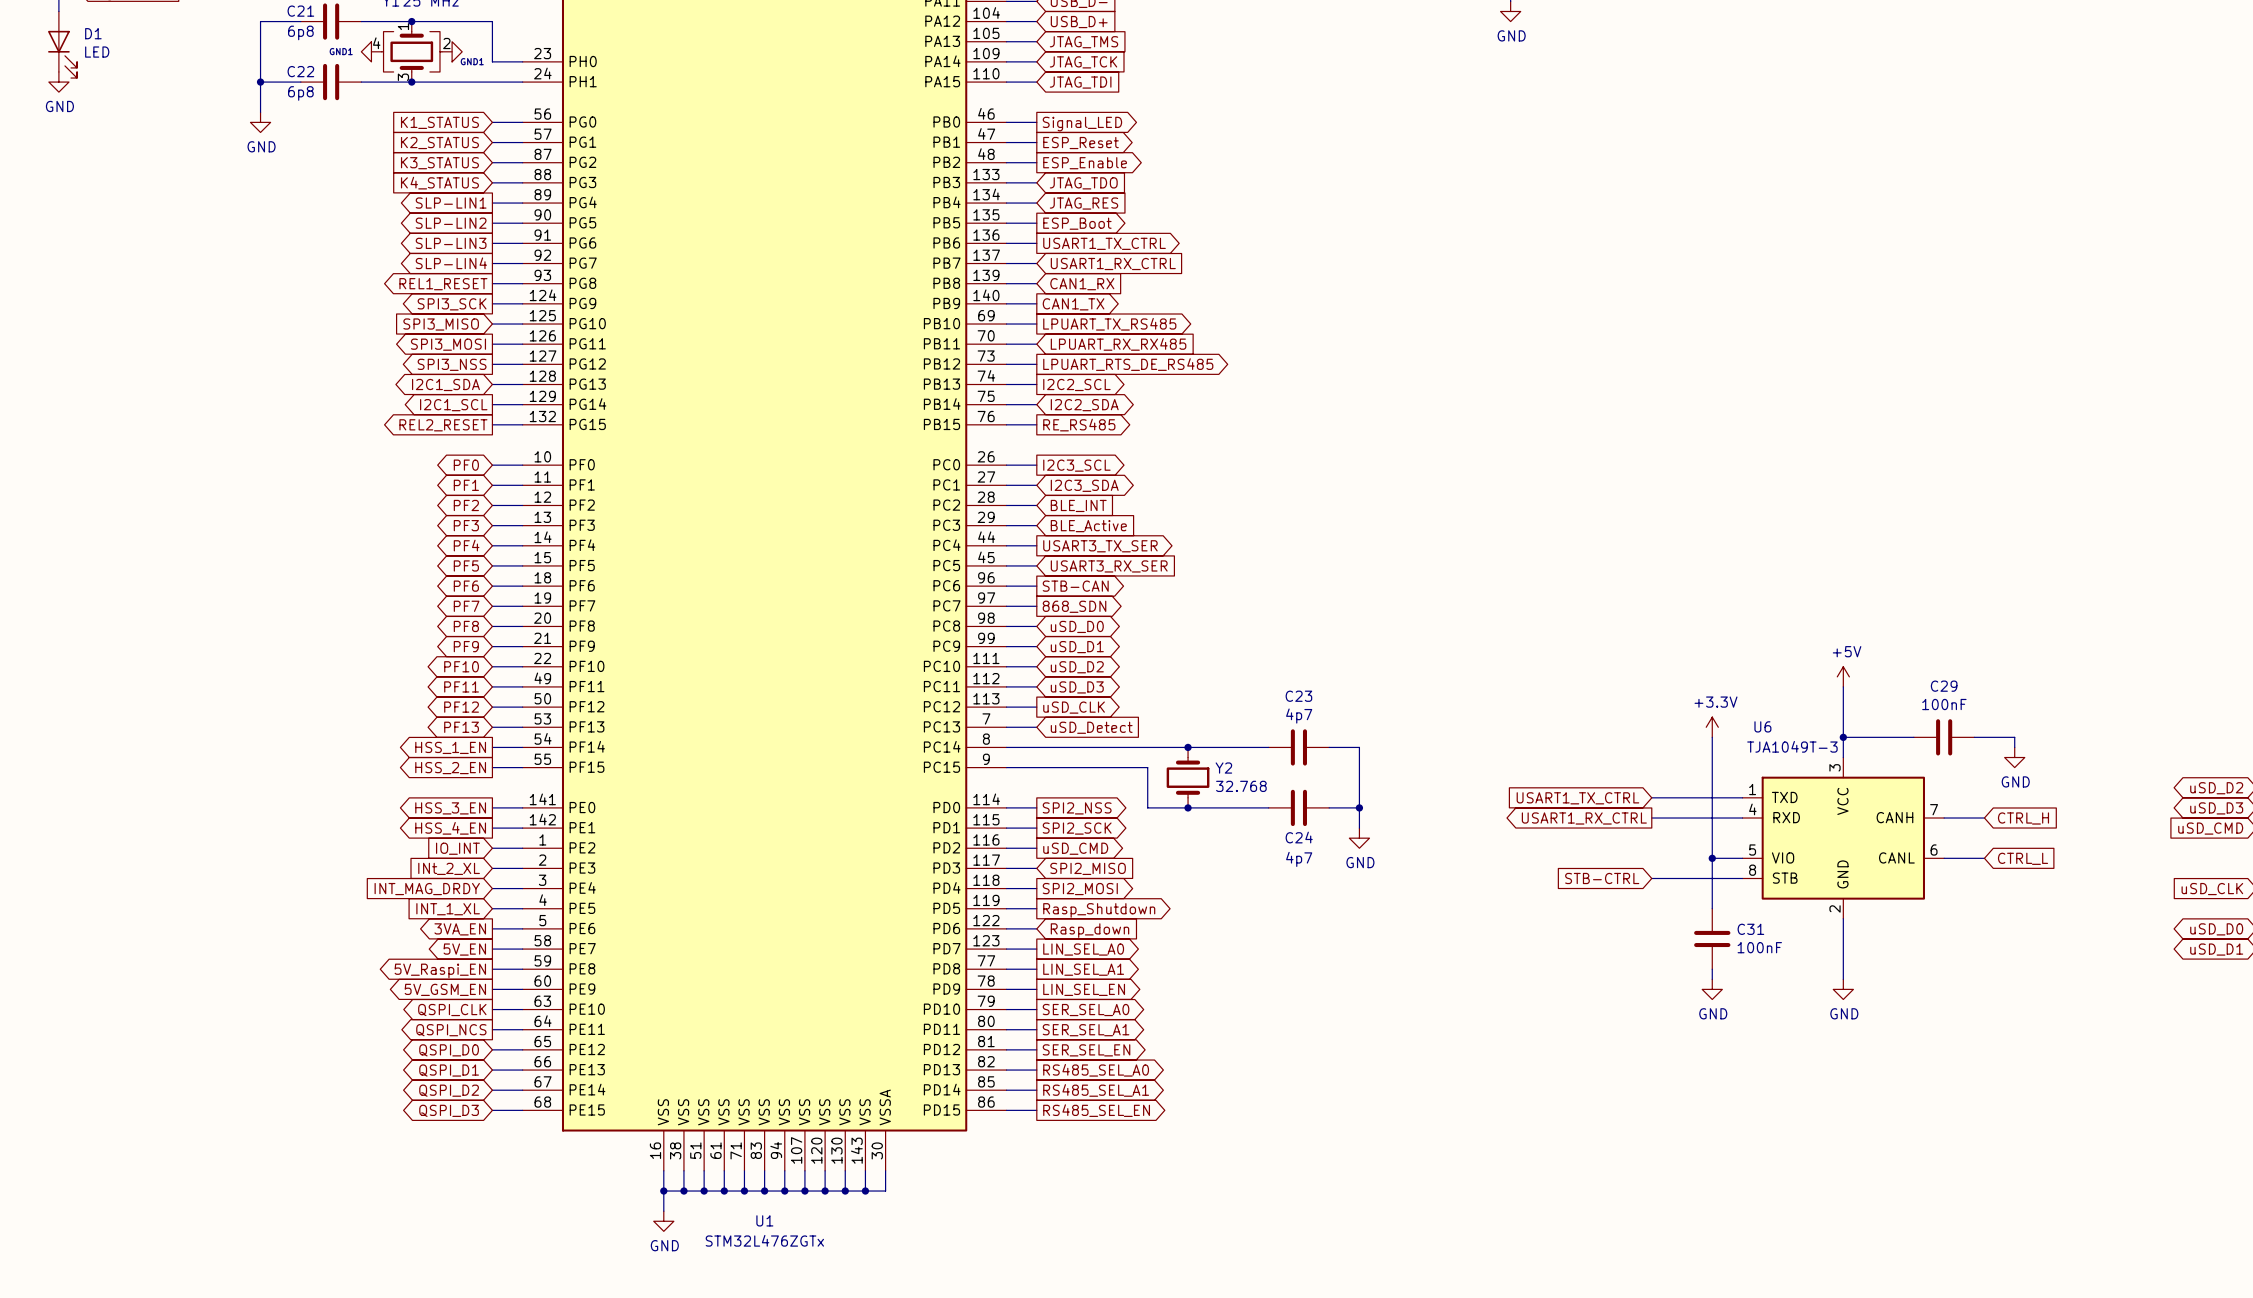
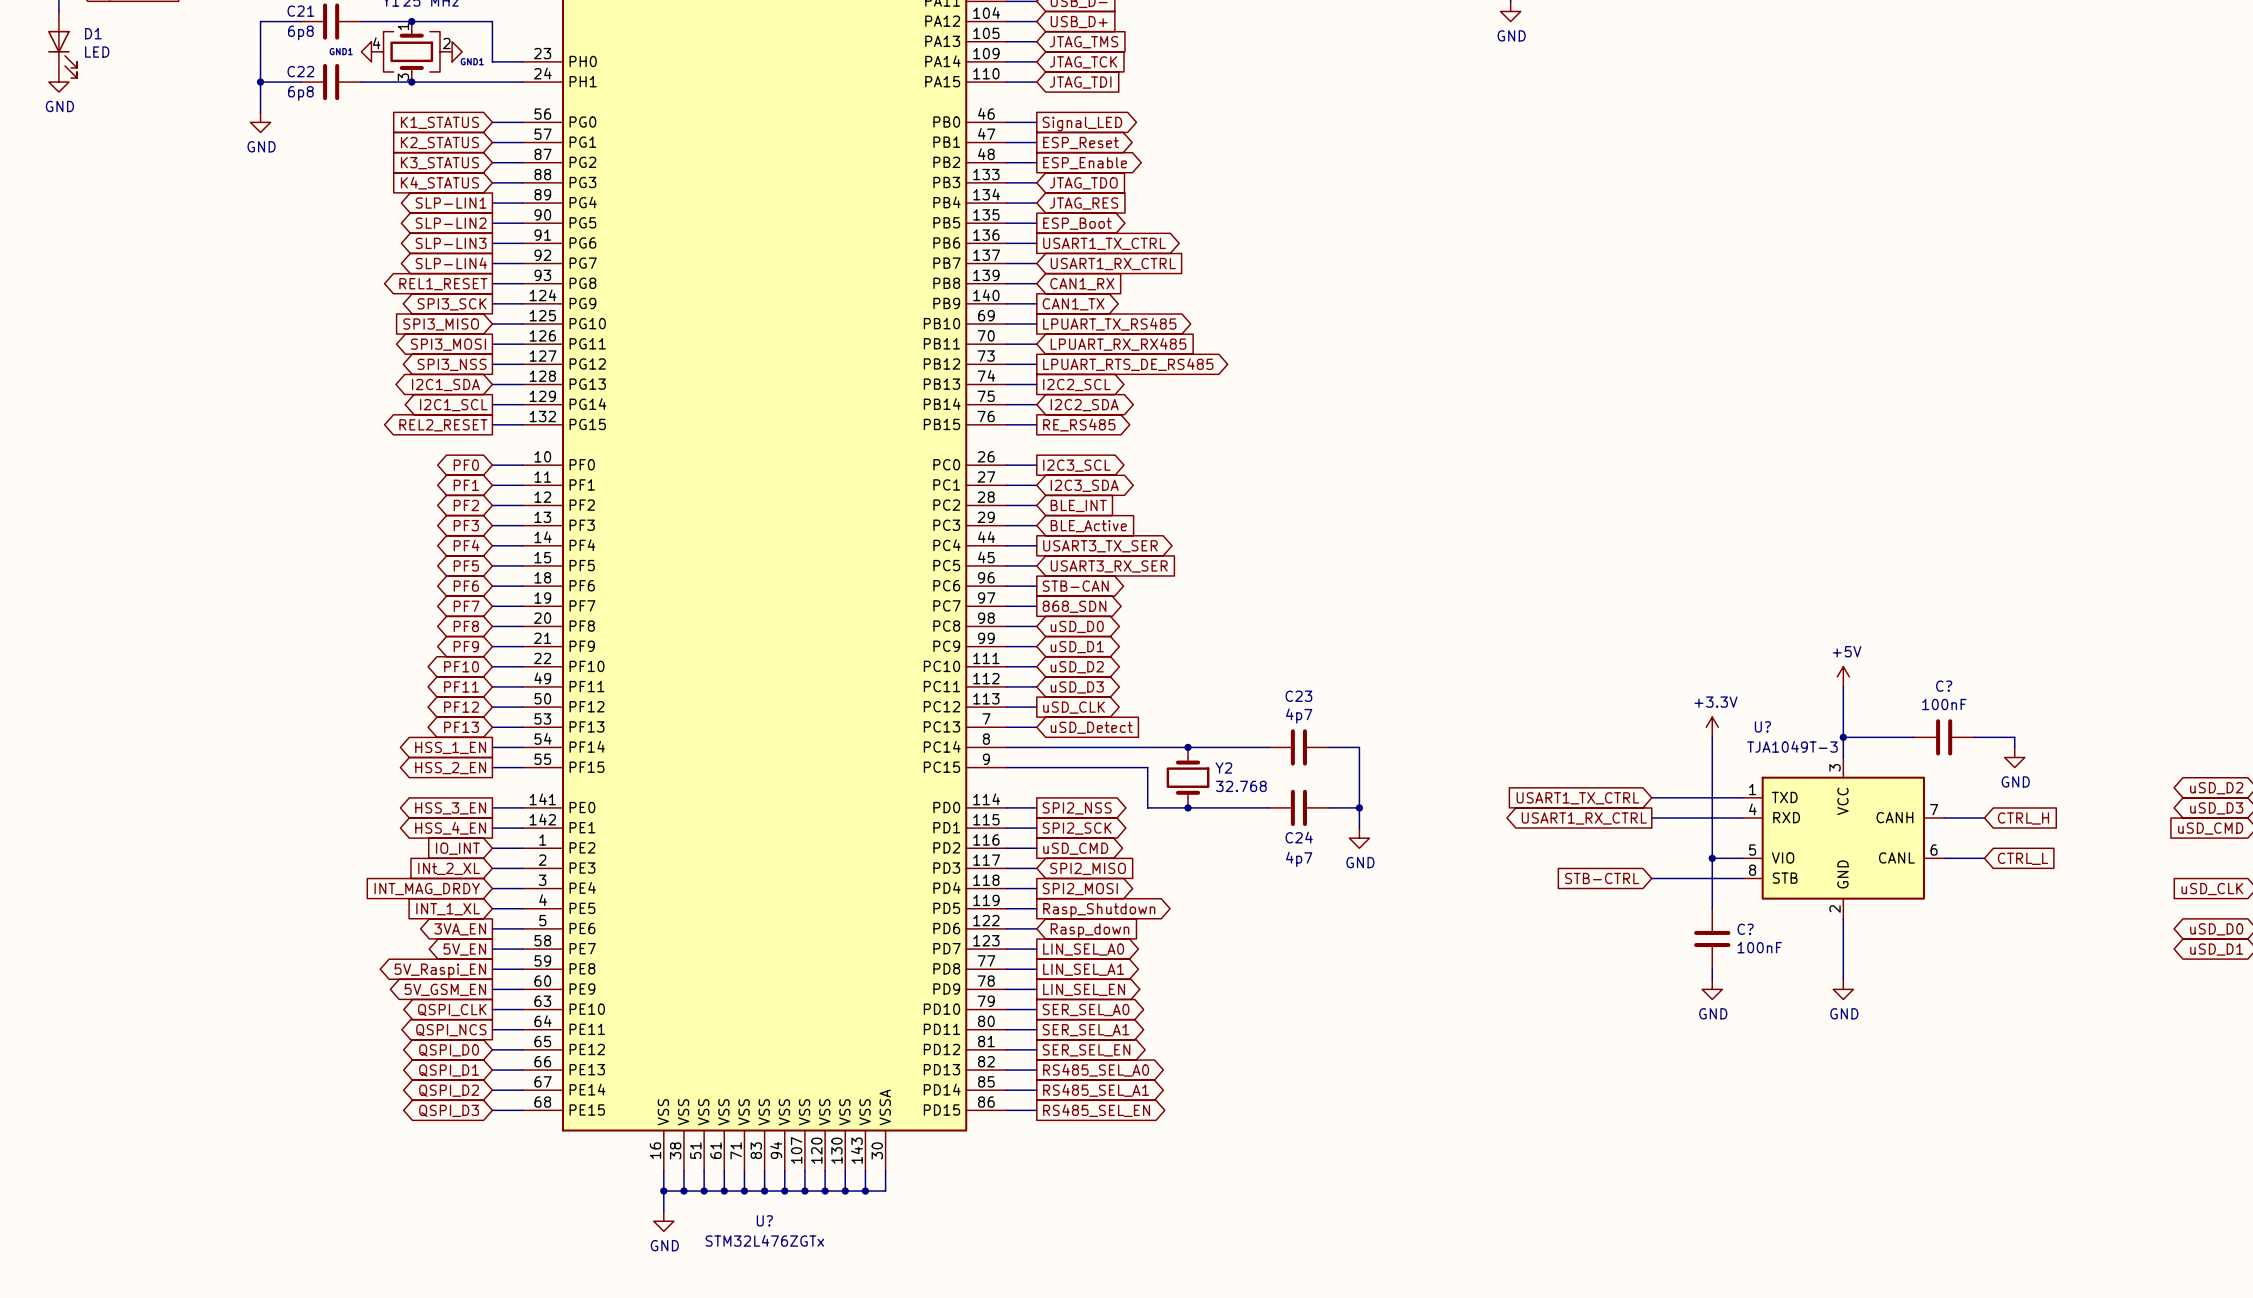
C29 name: C29 (1944, 686) -> C? (1944, 686)
U6 name: U6 (1762, 726) -> U? (1762, 726)
C31 name: C31 (1750, 929) -> C? (1745, 929)
U1 name: U1 (764, 1220) -> U? (764, 1220)

